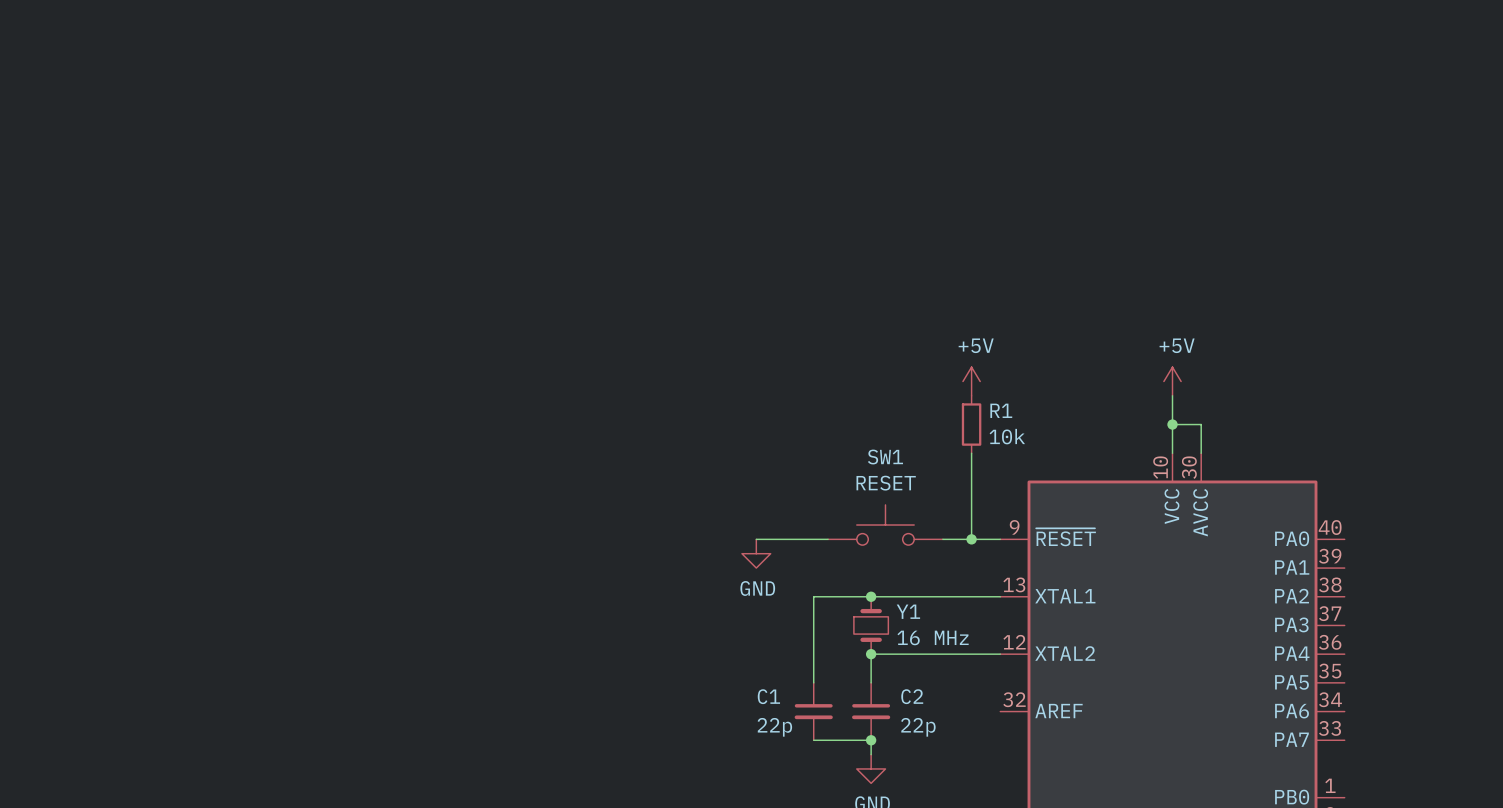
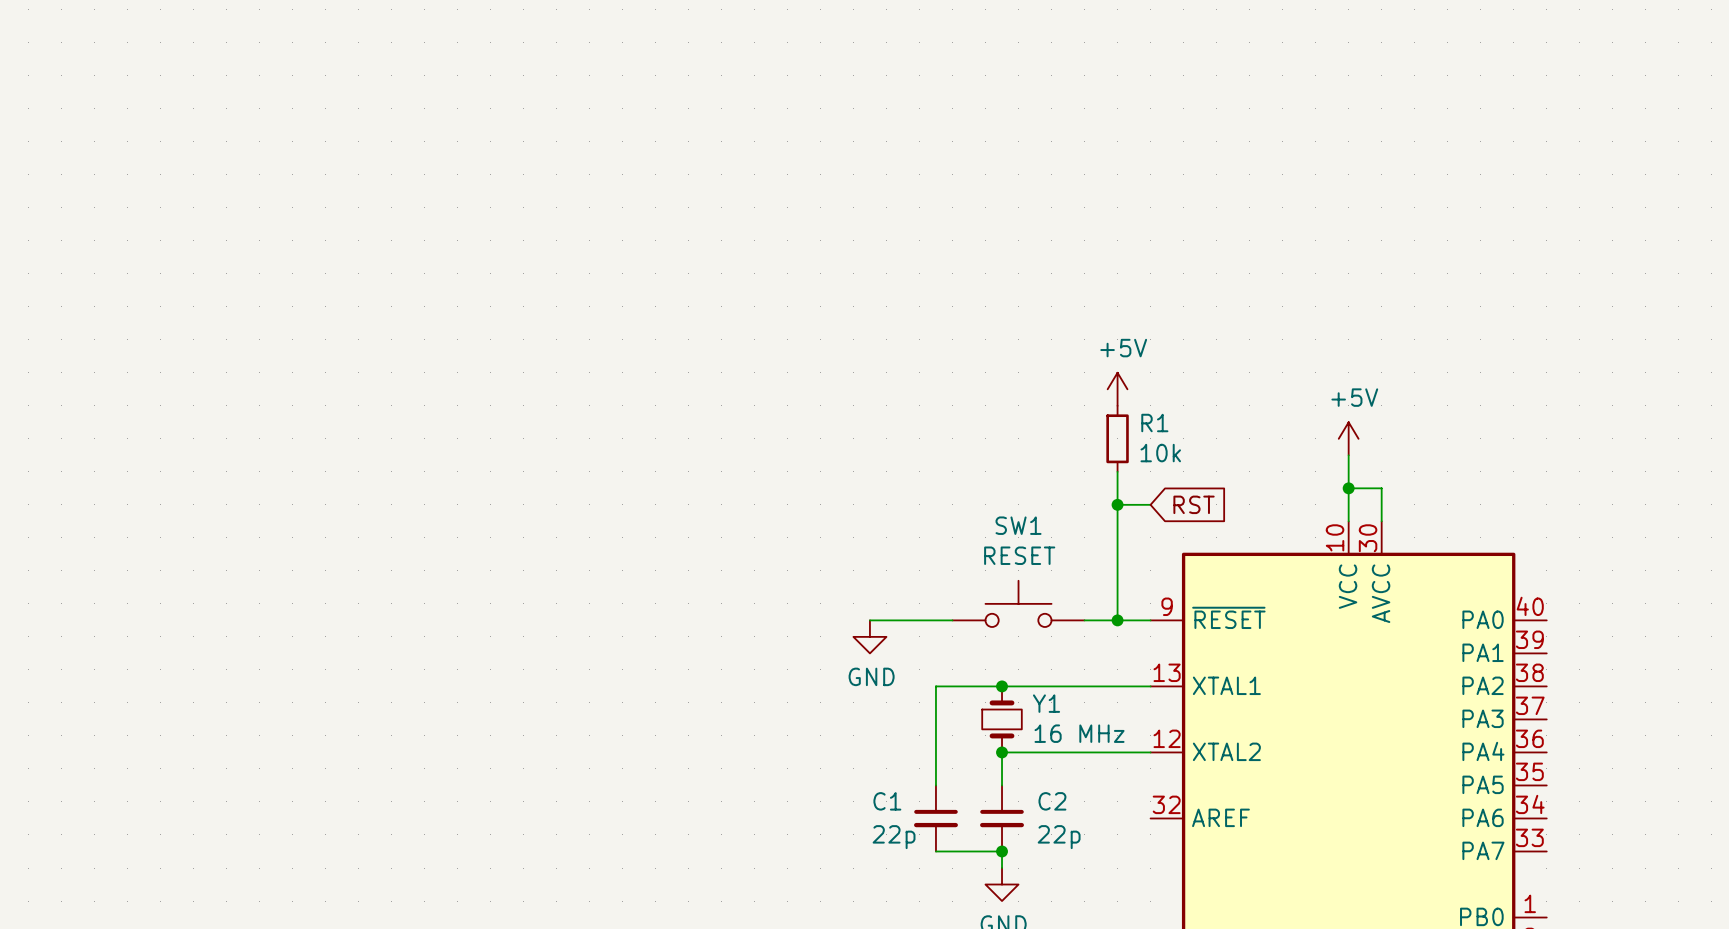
power symbol position: +5V (971, 381) -> +5V (1117, 389)
wire: none -> (1117, 471) (1117, 521)
R1 position: (971, 424) -> (1117, 438)
wire: none -> (1117, 504) (1150, 504)
junction: none -> (1117, 504)
global label: none -> RST (1194, 504)

